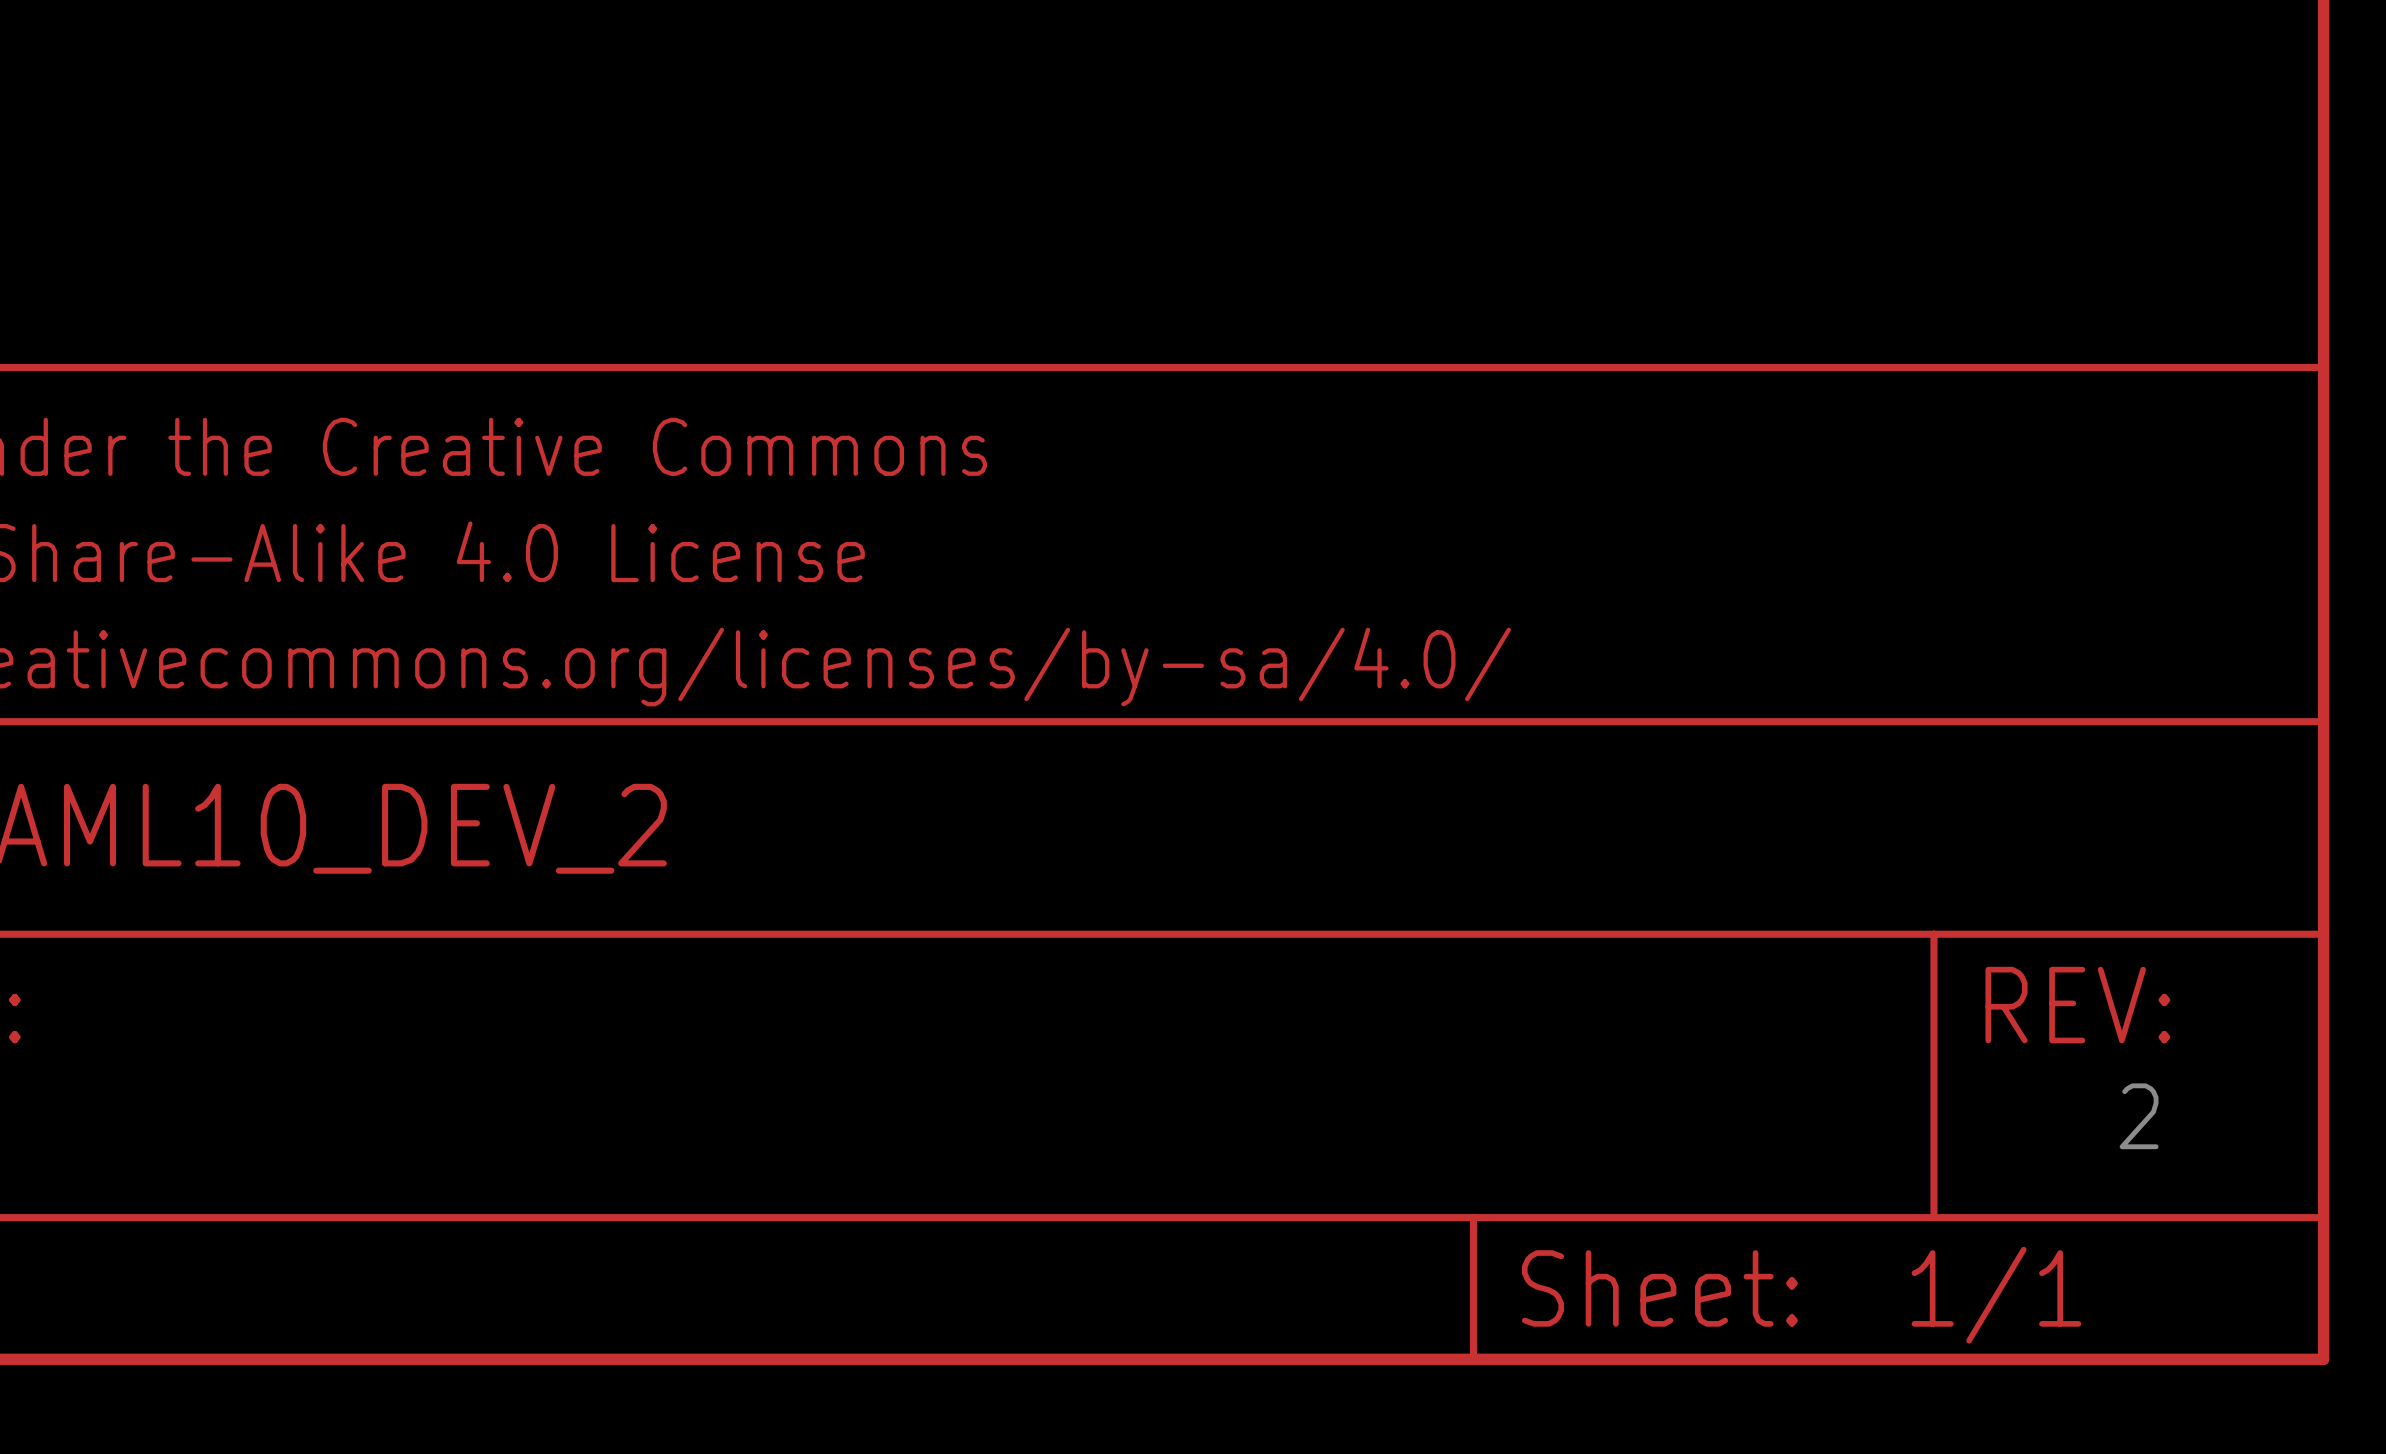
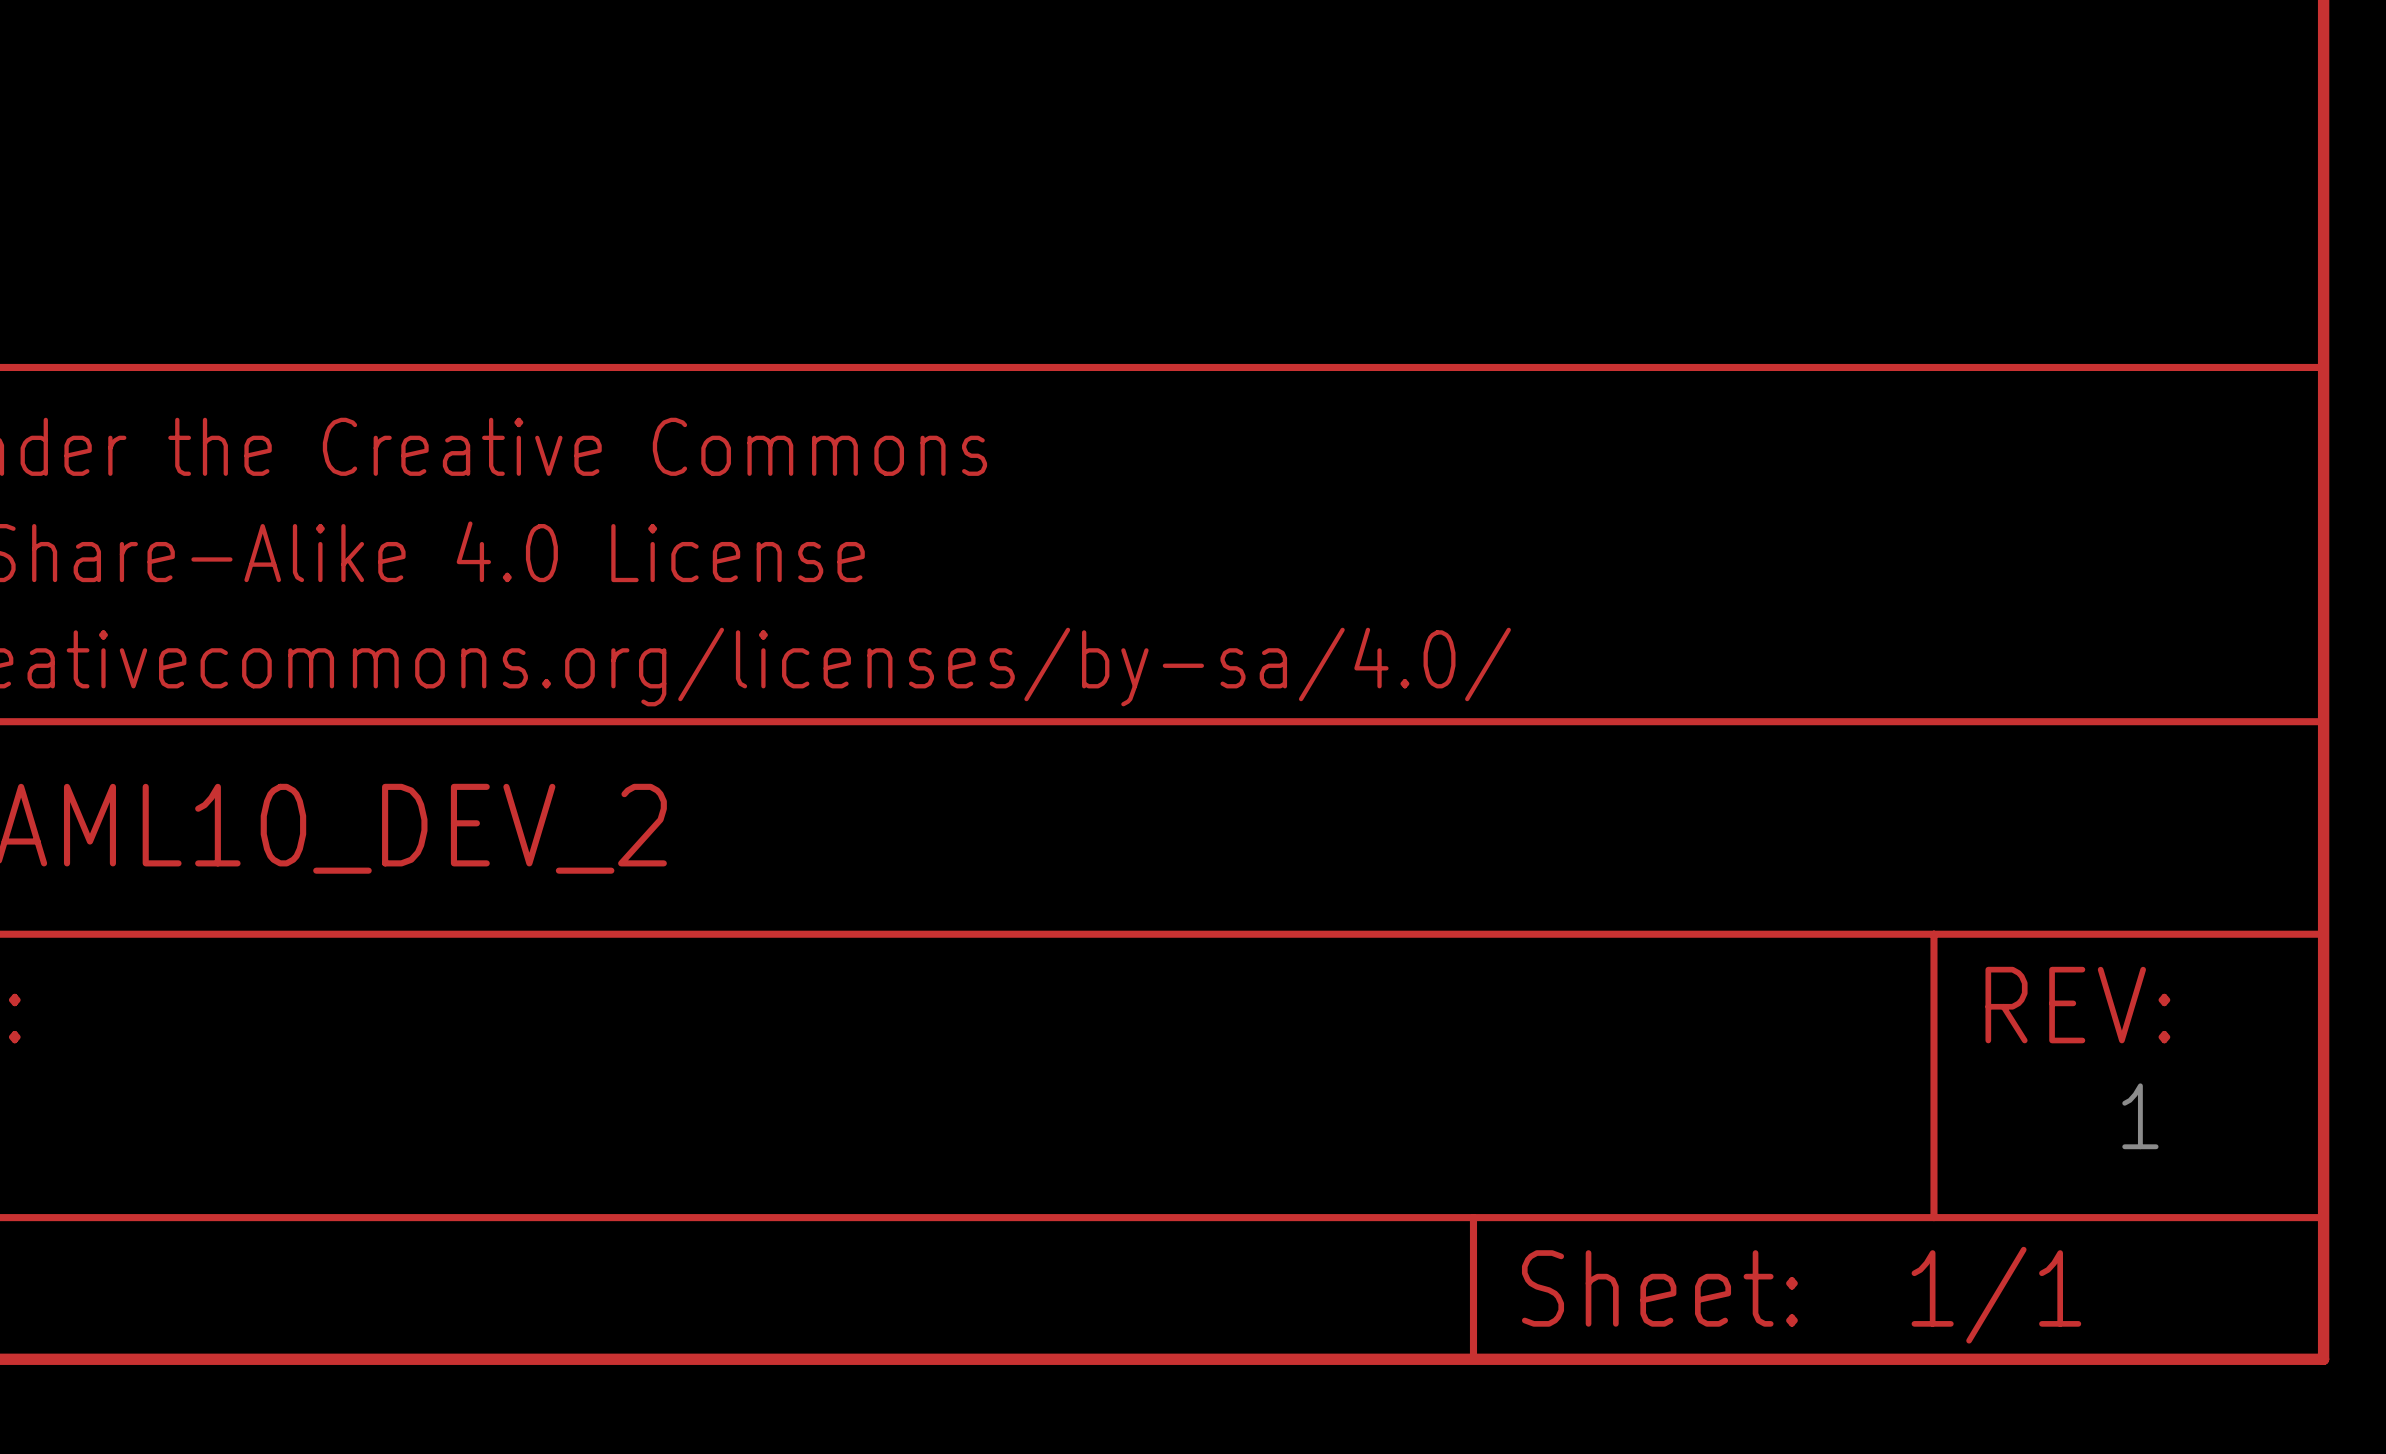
text: 2 (2139, 1116) -> 1 (2140, 1116)

